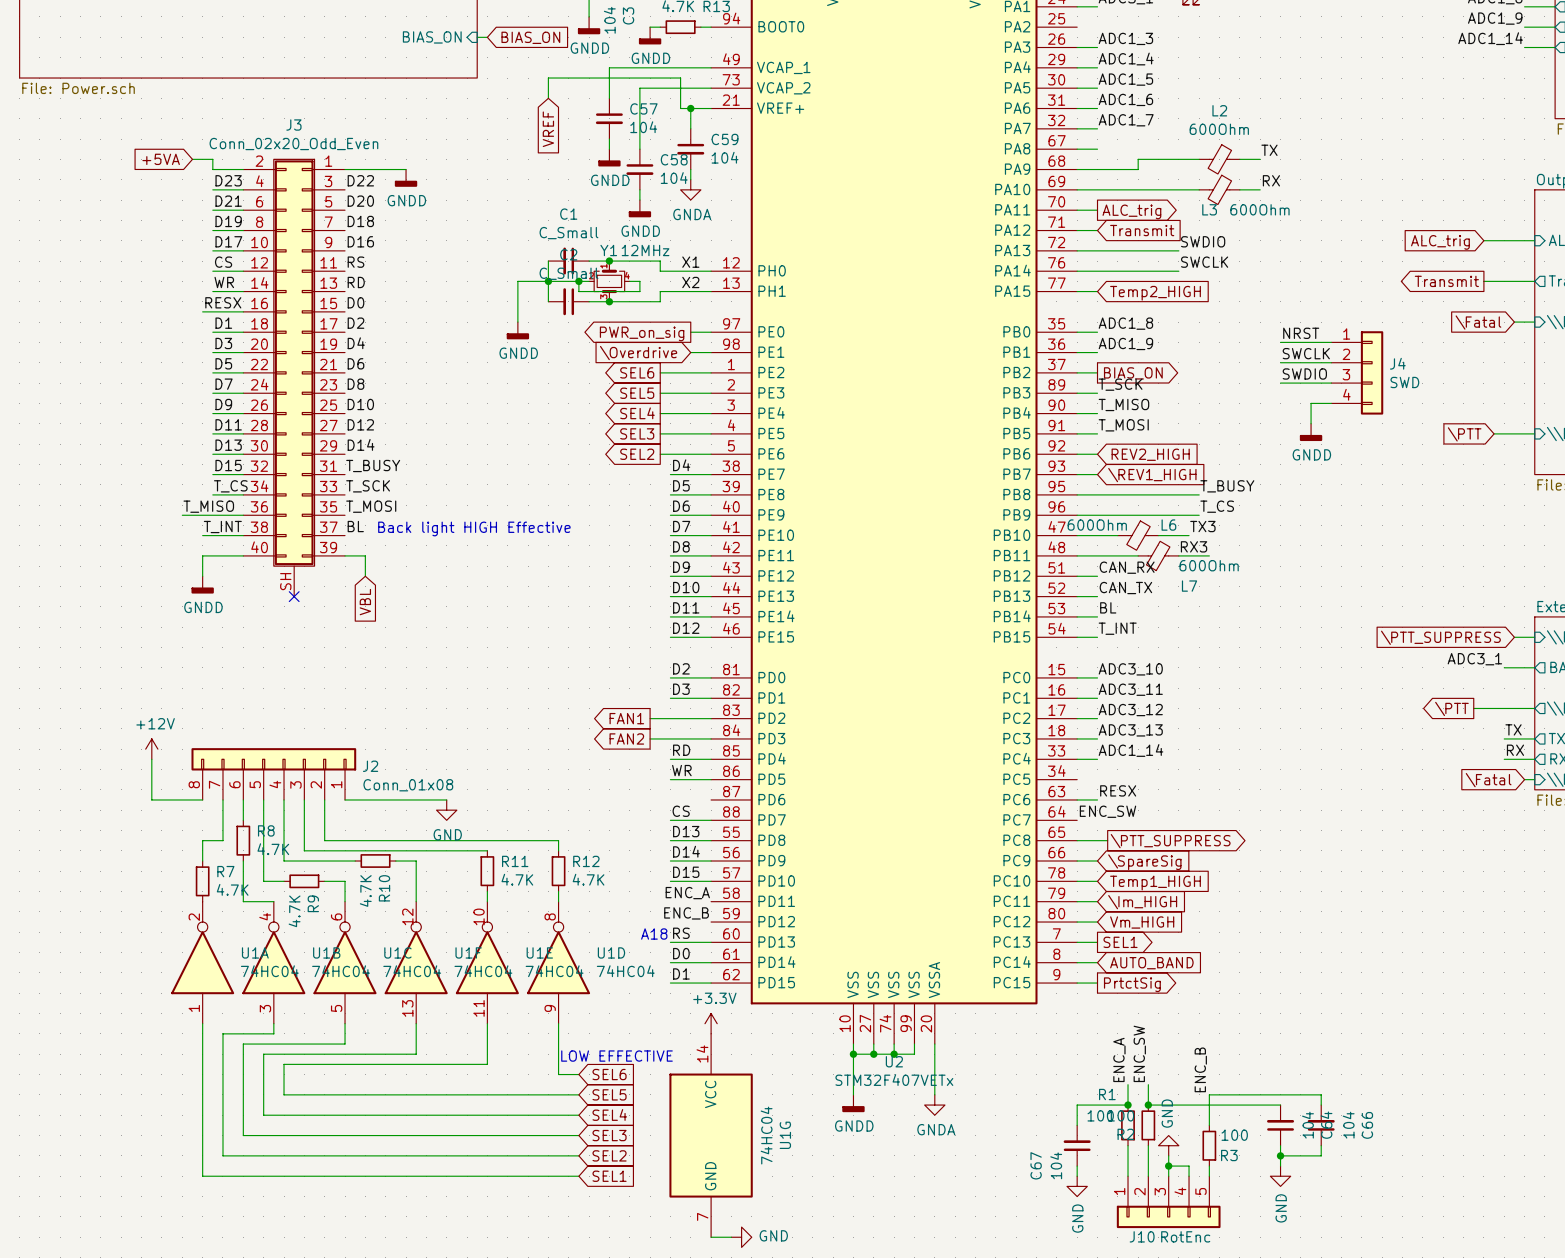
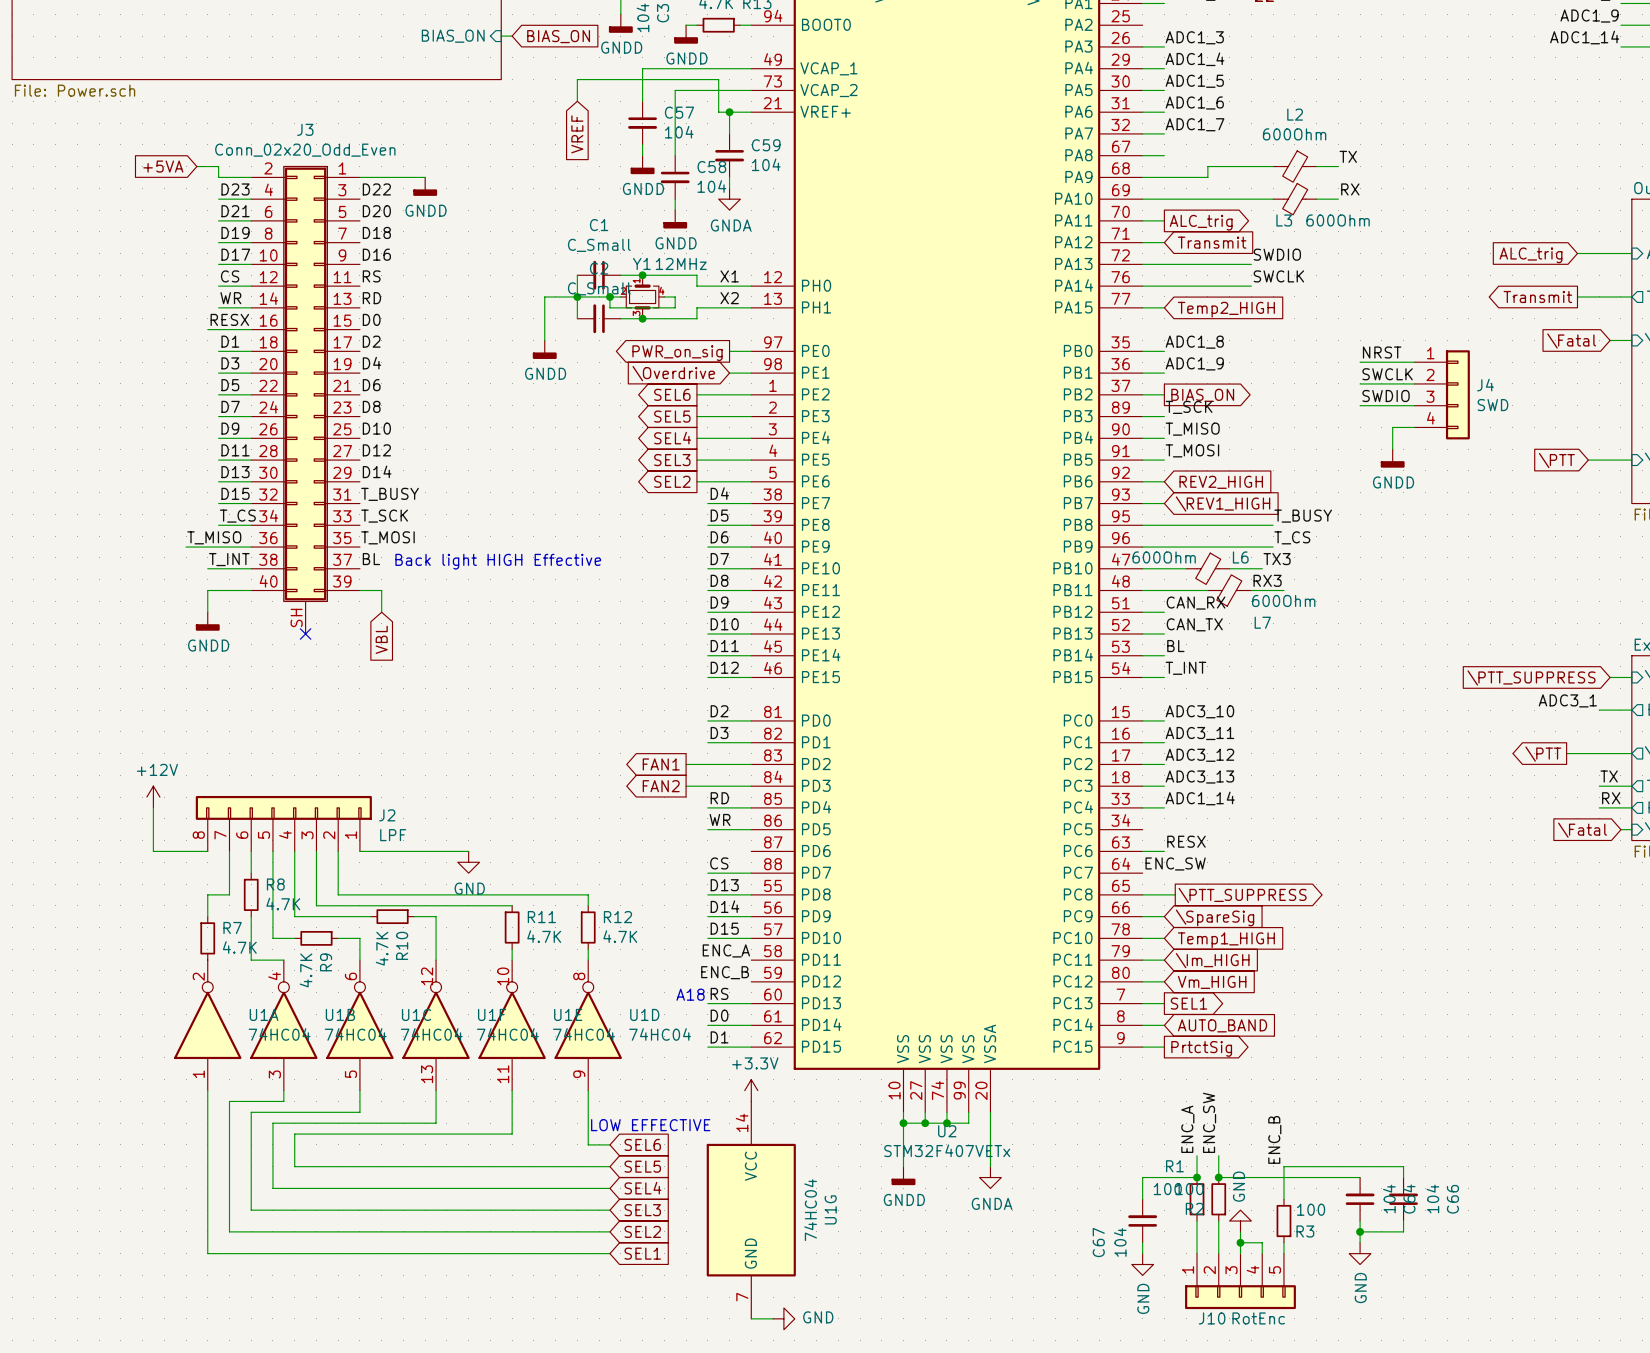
J2 value: Conn_01x08 (408, 785) -> LPF (393, 835)

